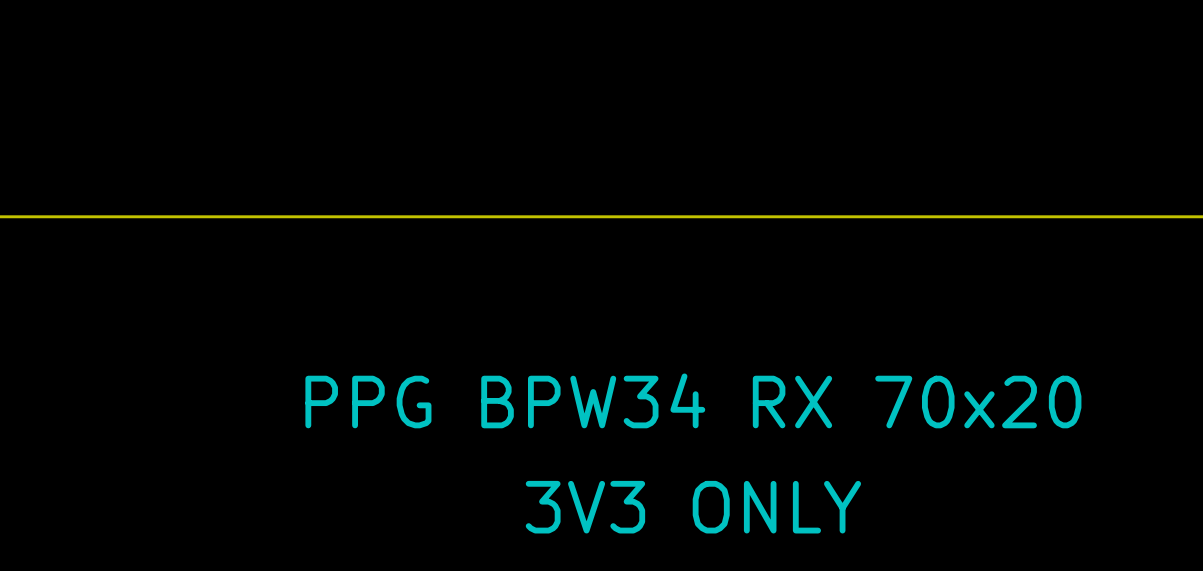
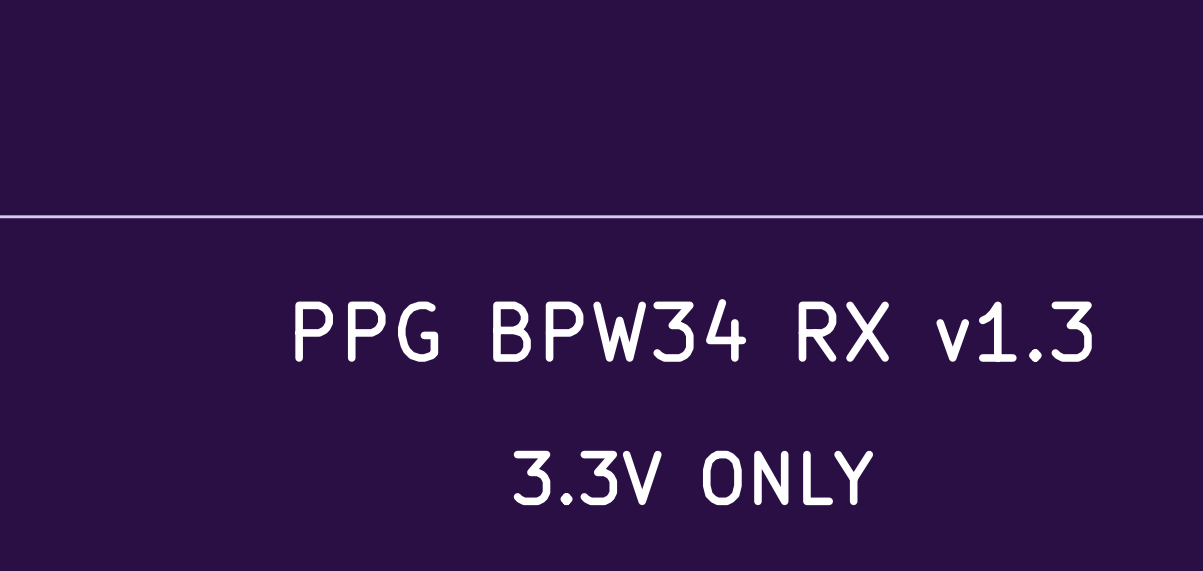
text: PPG BPW34 RX 70x20 (693, 400) -> PPG BPW34 RX v1.3 (693, 330)
text: 3V3 ONLY (693, 507) -> 3.3V ONLY (693, 477)

